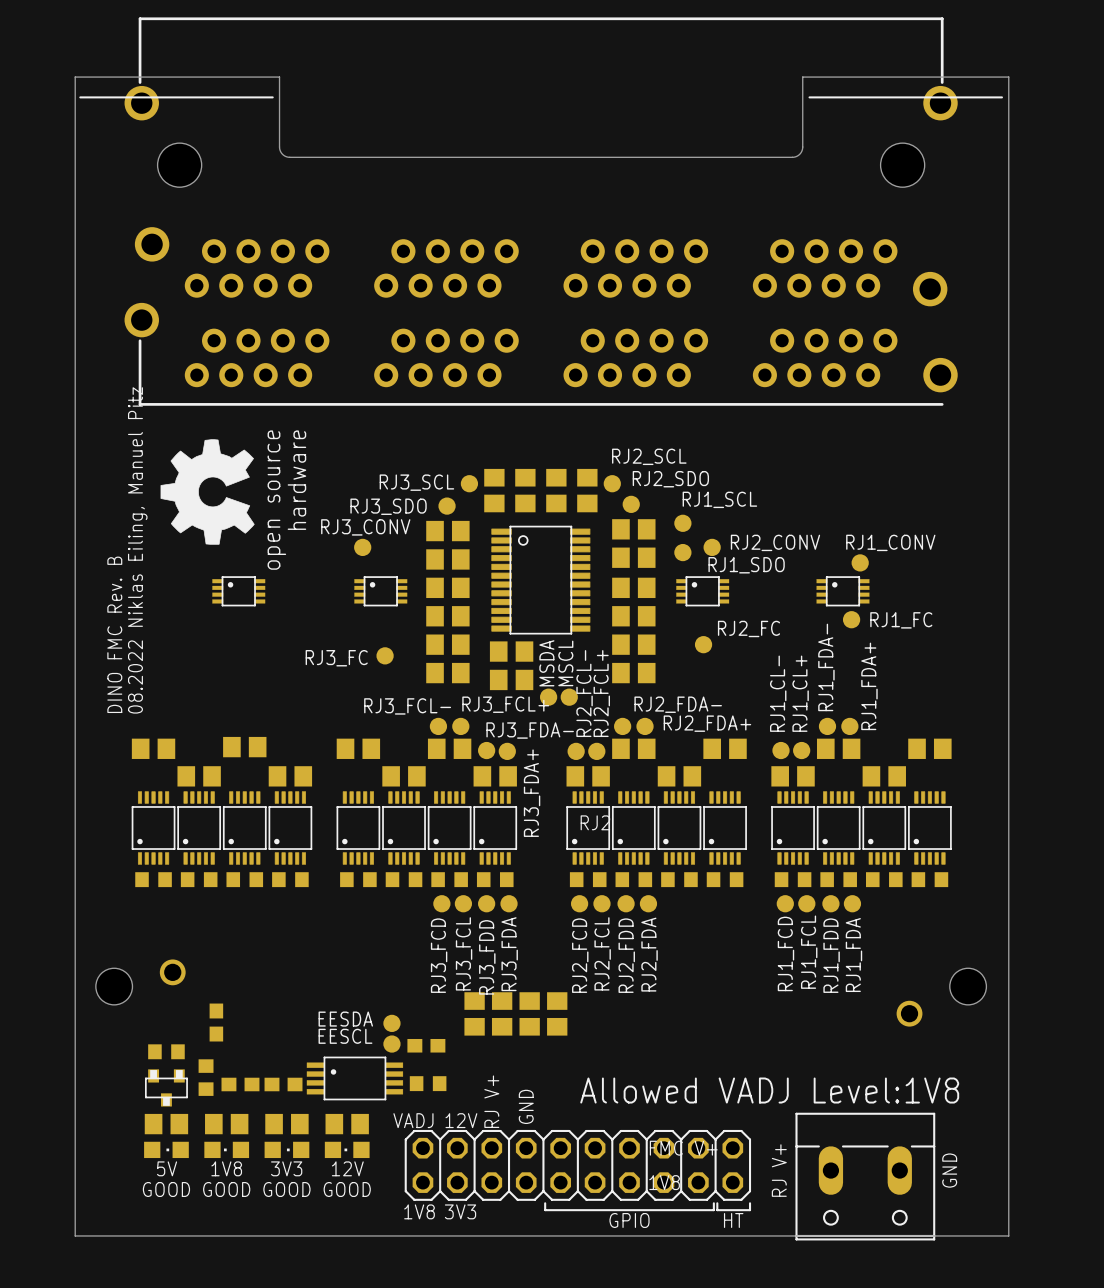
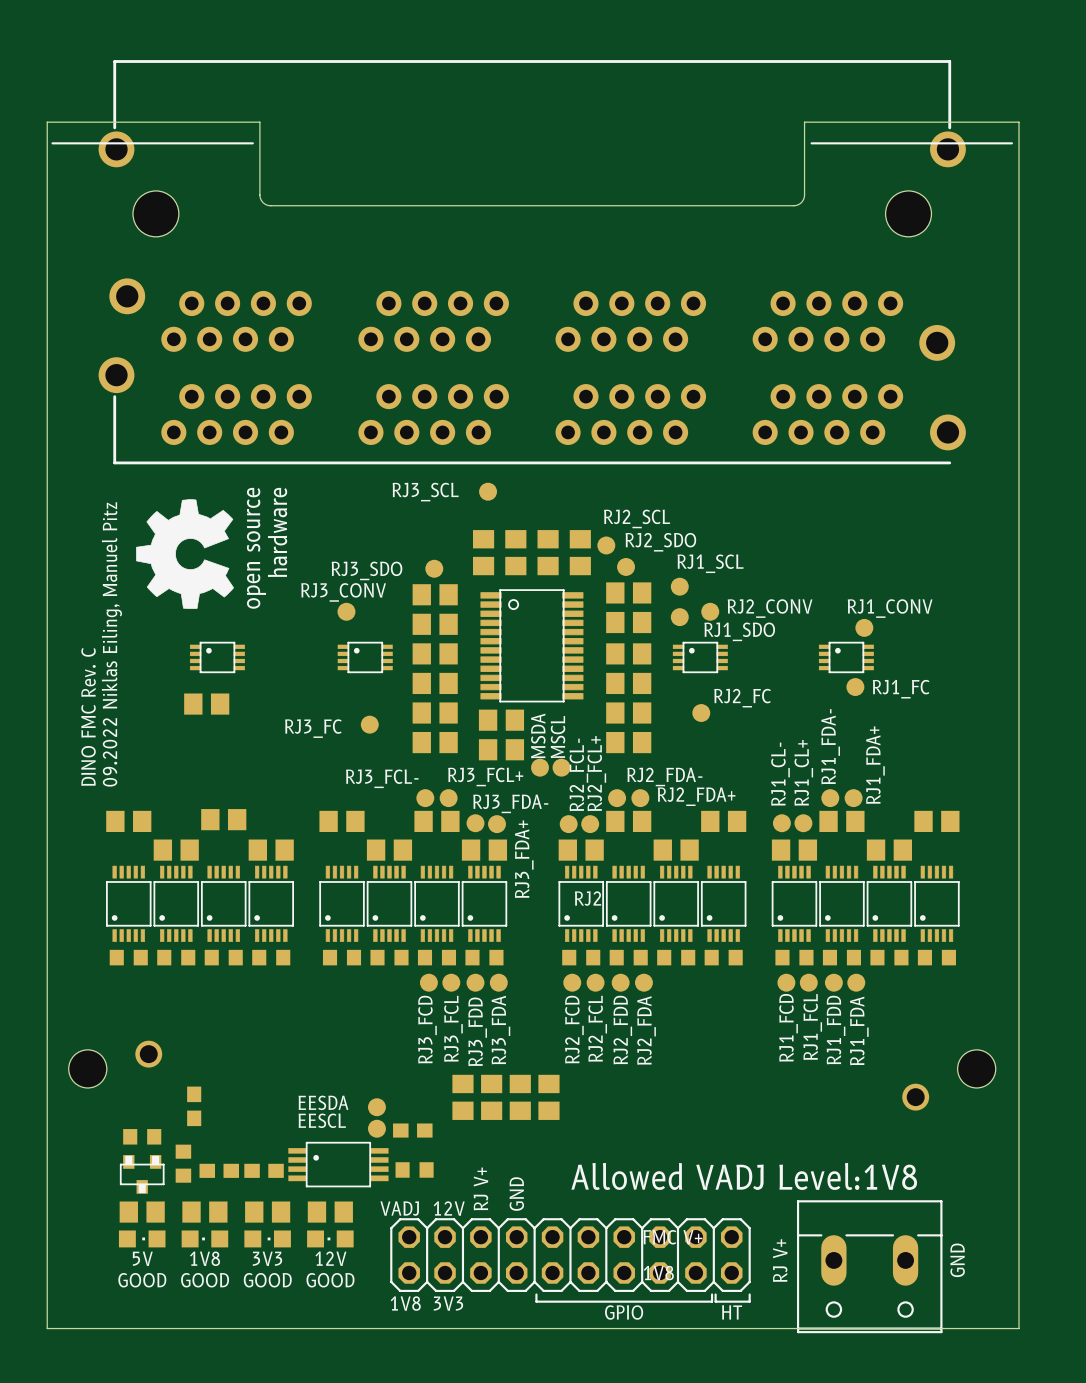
RJ3_SCL position: (469, 483) -> (488, 491)
text: 08.2022 Niklas Eiling, Manuel Pitz (137, 550) -> 09.2022 Niklas Eiling, Manuel Pitz (111, 644)
text: DINO FMC Rev. B (114, 634) -> DINO FMC Rev. C (88, 716)
part: none -> (206, 704)

